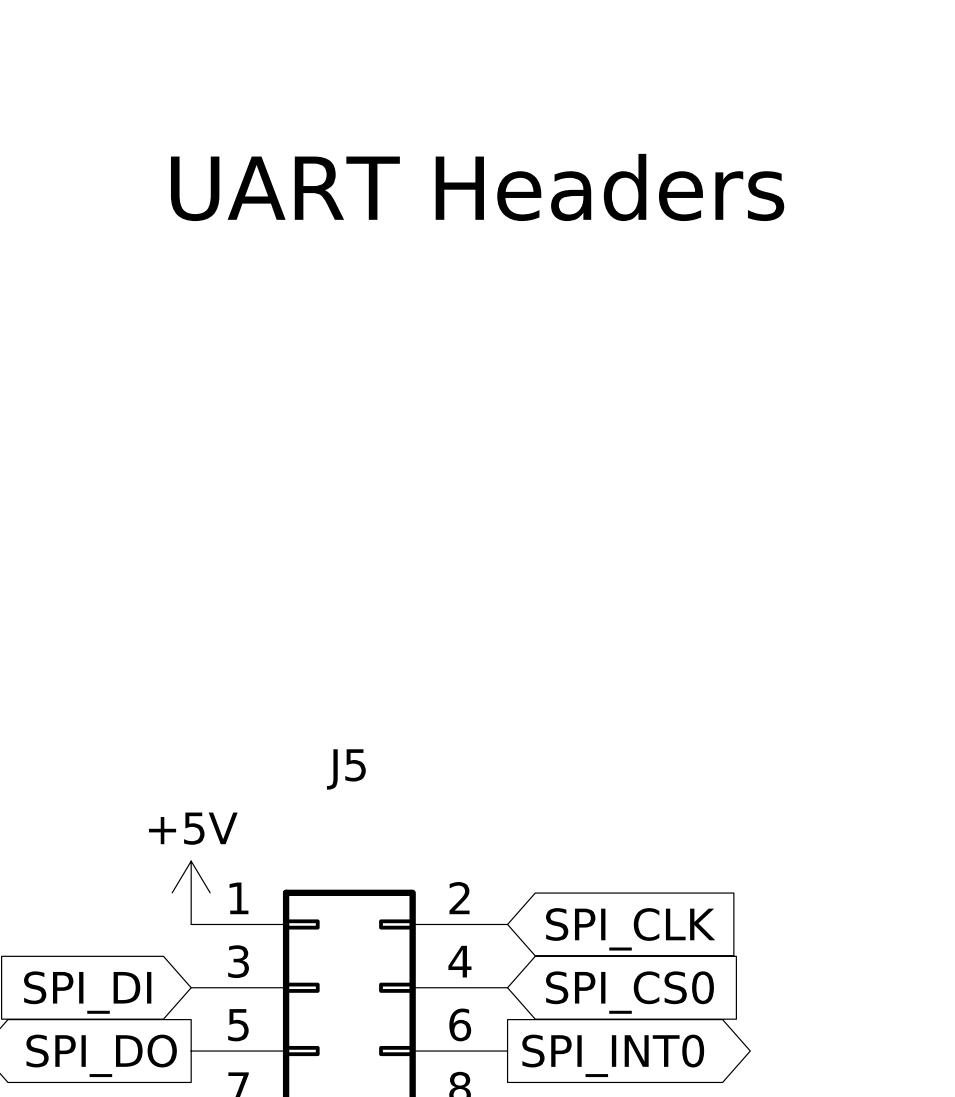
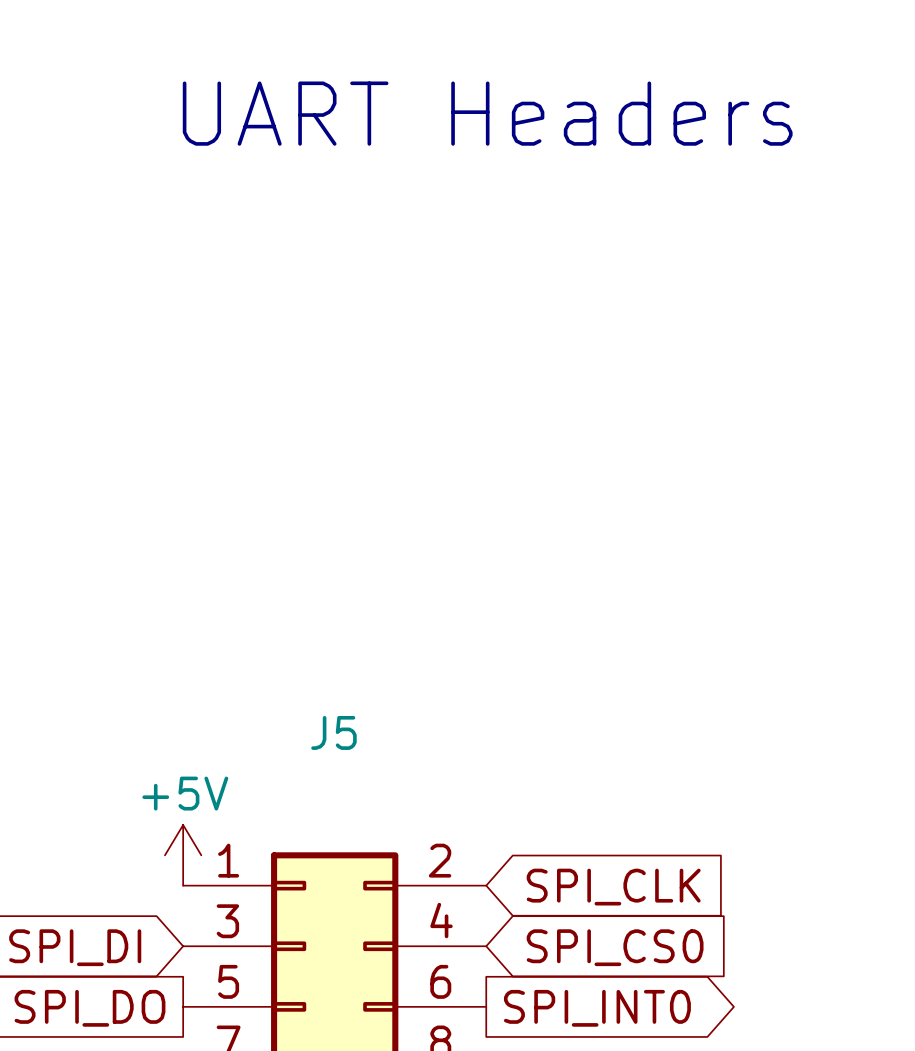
text position: UART Headers (477, 187) -> UART Headers (487, 113)

